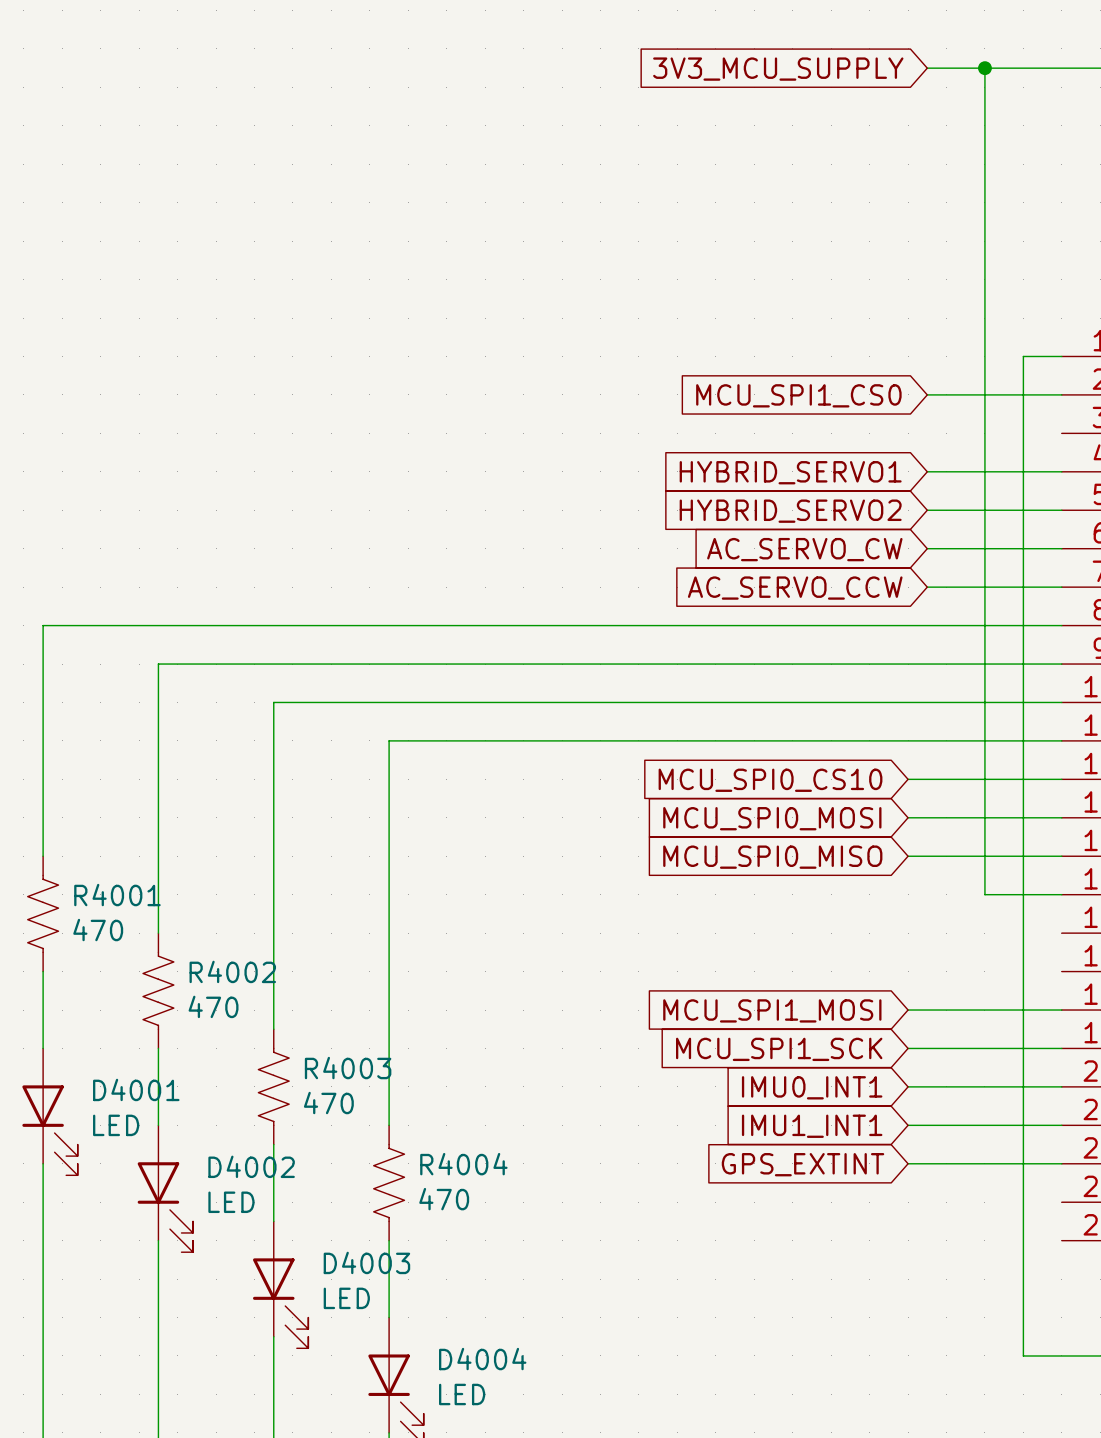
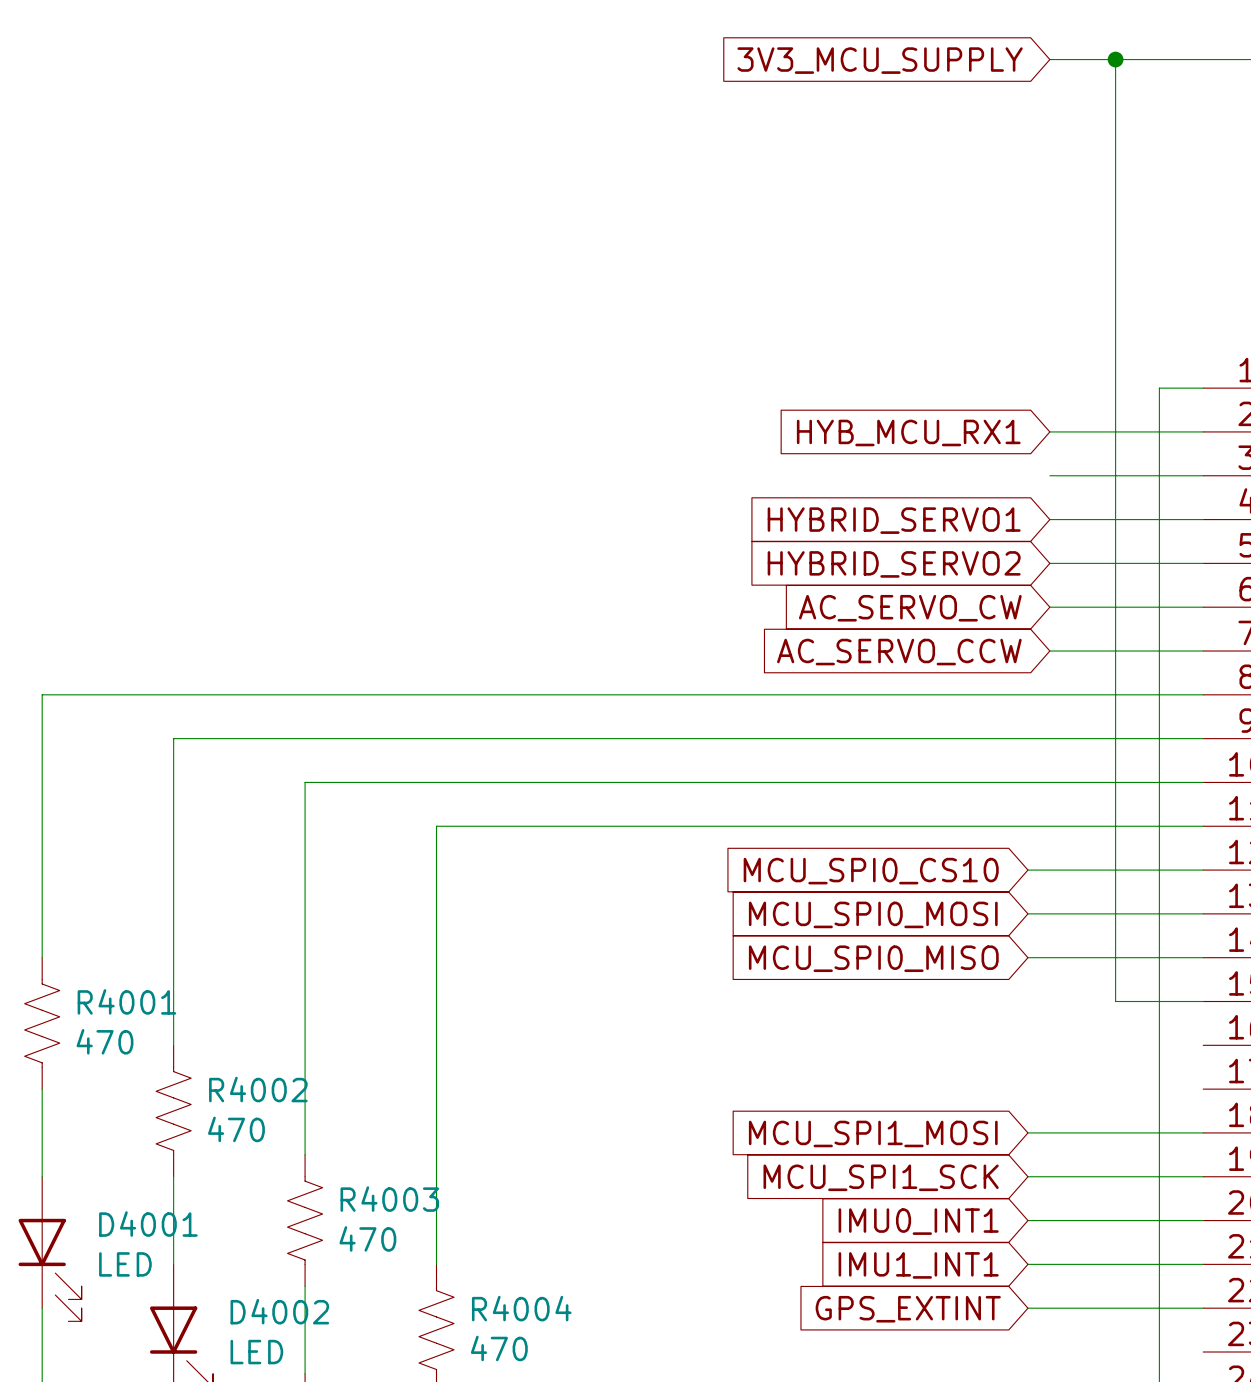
global label: MCU_SPI1_CS0 (798, 395) -> HYB_MCU_RX1 (908, 432)
wire: none -> (1049, 475) (1203, 475)

